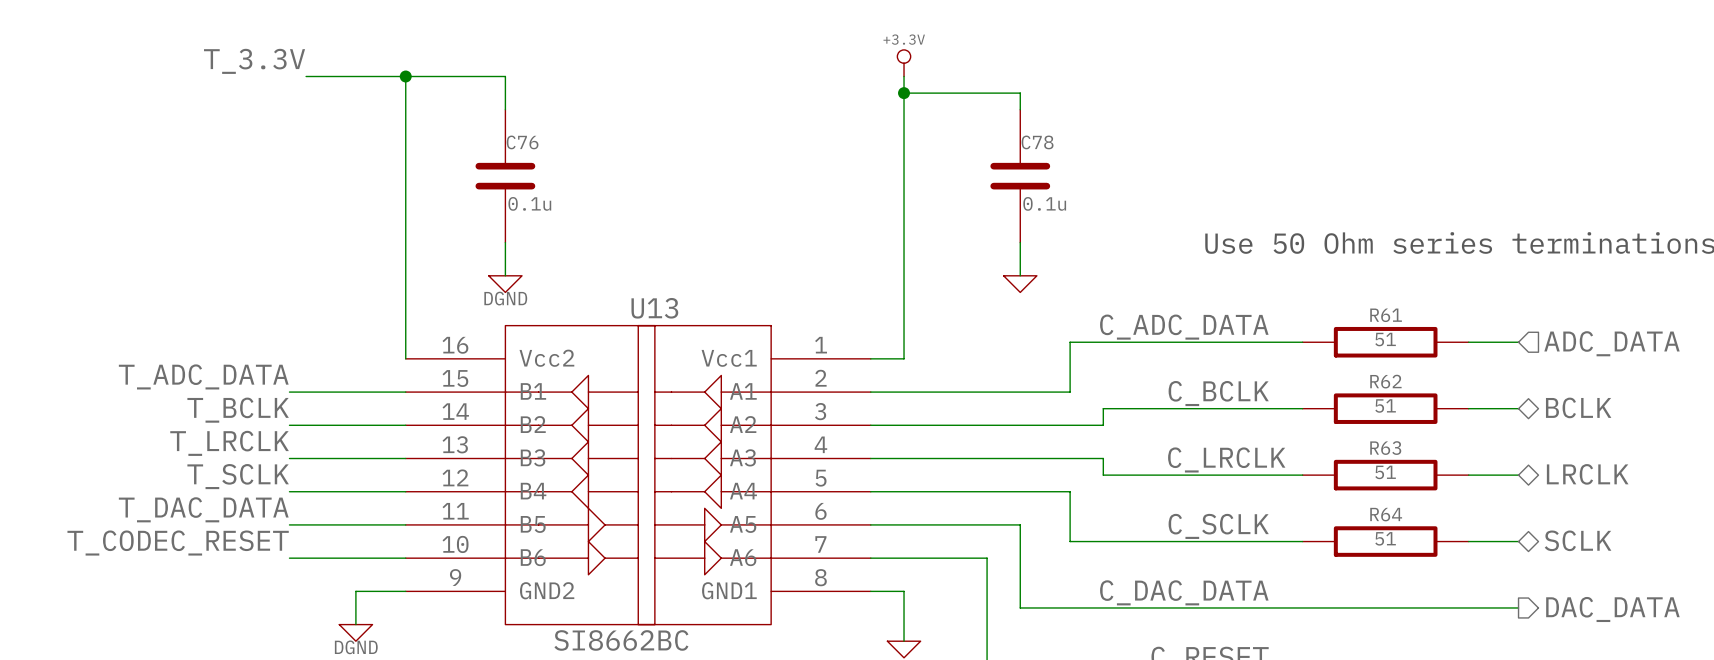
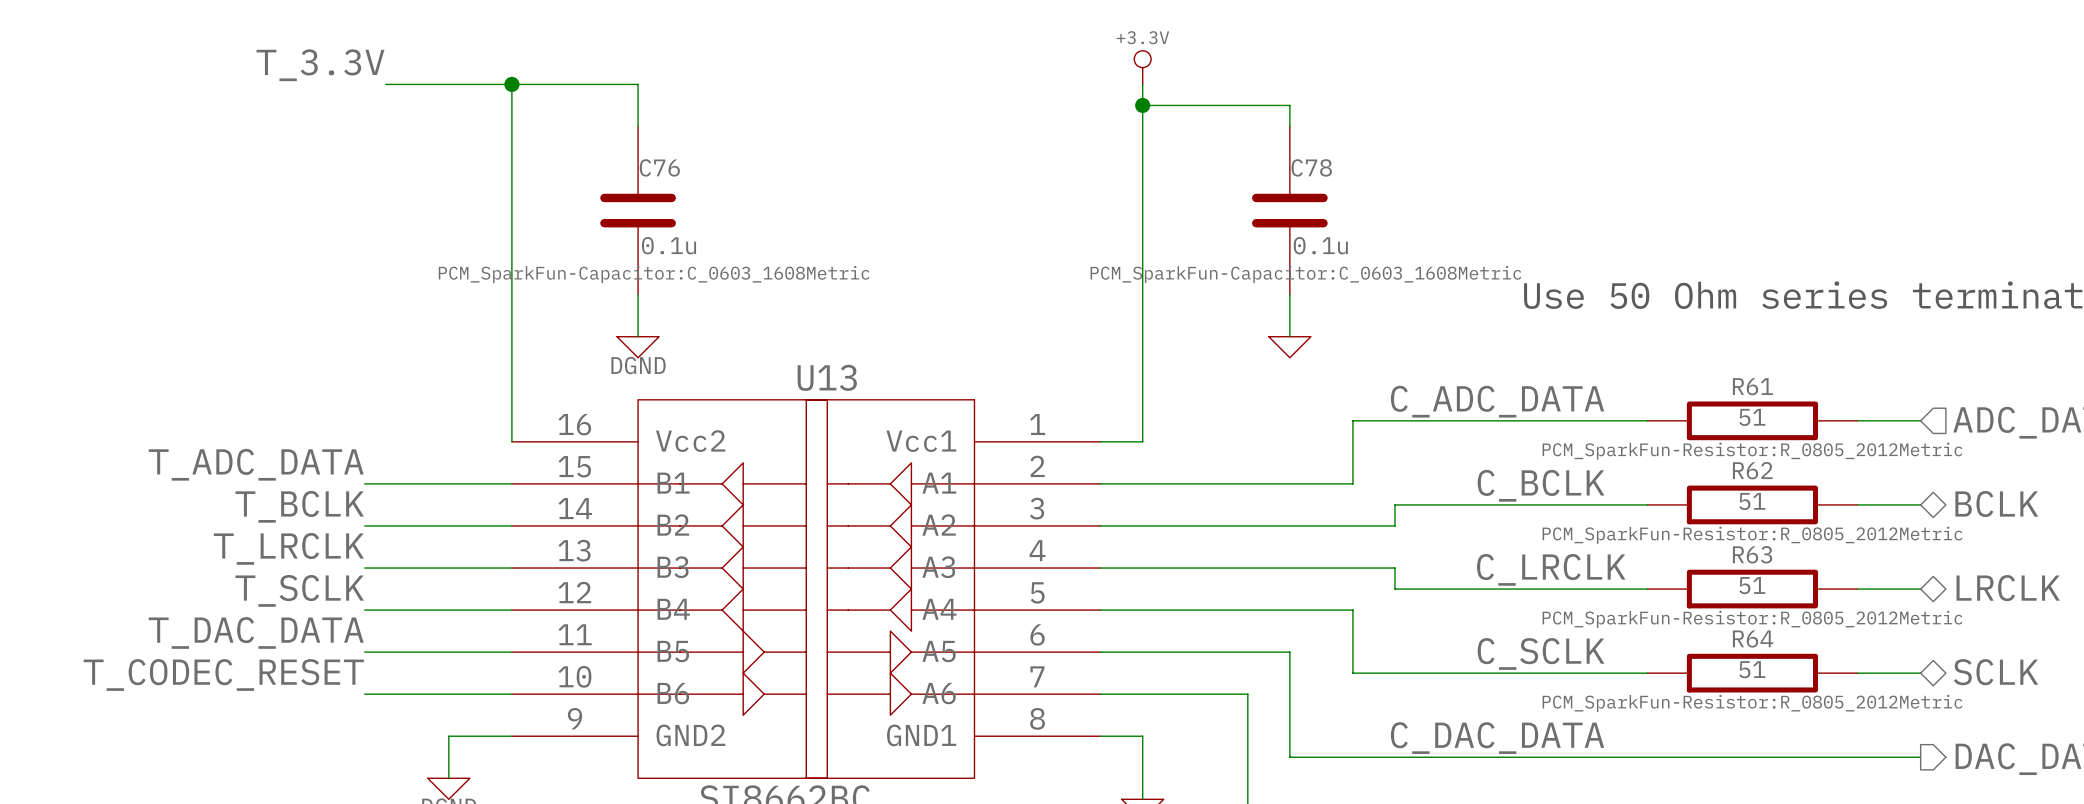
C76 text: none -> PCM_SparkFun-Capacitor:C_0603_1608Metric (654, 274)
C78 text: none -> PCM_SparkFun-Capacitor:C_0603_1608Metric (1305, 274)
R61 text: none -> PCM_SparkFun-Resistor:R_0805_2012Metric (1752, 451)
R62 text: none -> PCM_SparkFun-Resistor:R_0805_2012Metric (1752, 535)
R63 text: none -> PCM_SparkFun-Resistor:R_0805_2012Metric (1752, 619)
R64 text: none -> PCM_SparkFun-Resistor:R_0805_2012Metric (1752, 703)

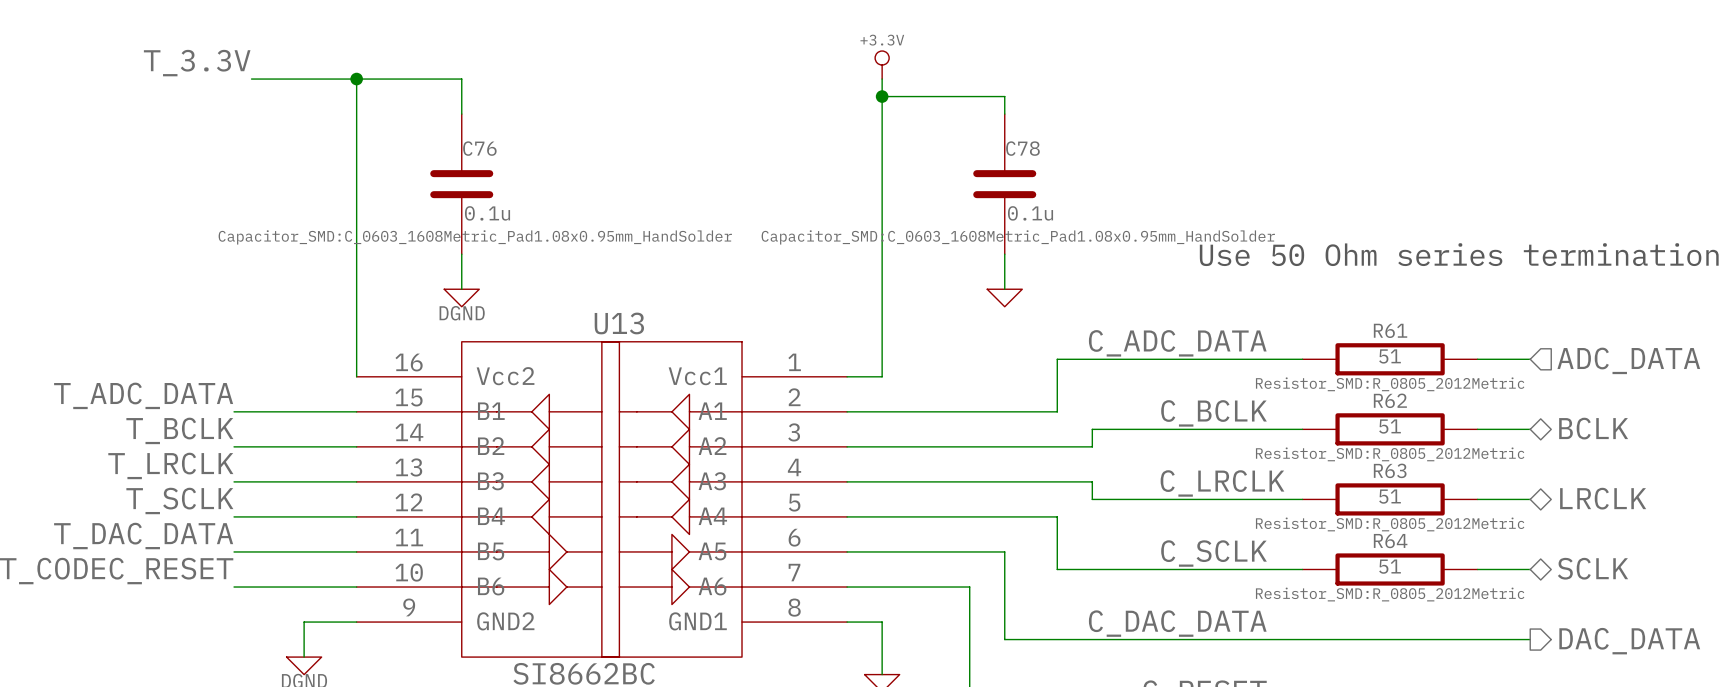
C76 text: PCM_SparkFun-Capacitor:C_0603_1608Metric (654, 274) -> Capacitor_SMD:C_0603_1608Metric_Pad1.08x0.95mm_HandSolder (475, 237)
C78 text: PCM_SparkFun-Capacitor:C_0603_1608Metric (1305, 274) -> Capacitor_SMD:C_0603_1608Metric_Pad1.08x0.95mm_HandSolder (1018, 237)
R61 text: PCM_SparkFun-Resistor:R_0805_2012Metric (1752, 451) -> Resistor_SMD:R_0805_2012Metric (1390, 384)
R62 text: PCM_SparkFun-Resistor:R_0805_2012Metric (1752, 535) -> Resistor_SMD:R_0805_2012Metric (1390, 454)
R63 text: PCM_SparkFun-Resistor:R_0805_2012Metric (1752, 619) -> Resistor_SMD:R_0805_2012Metric (1390, 524)
R64 text: PCM_SparkFun-Resistor:R_0805_2012Metric (1752, 703) -> Resistor_SMD:R_0805_2012Metric (1390, 594)

